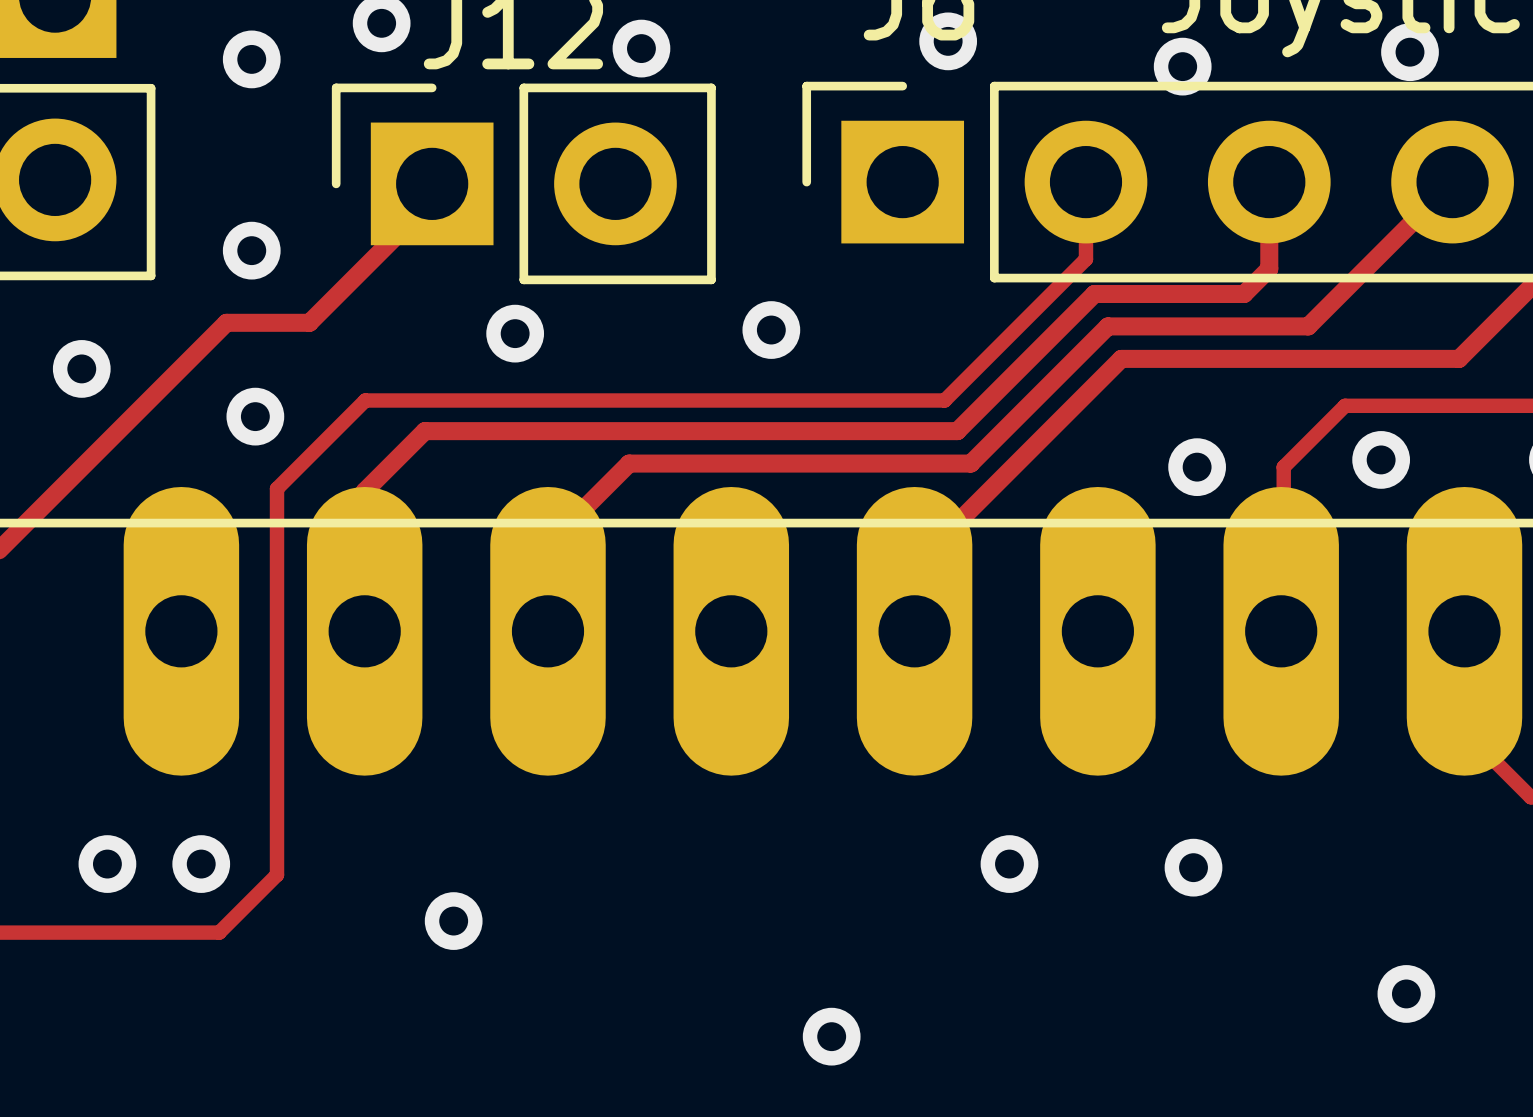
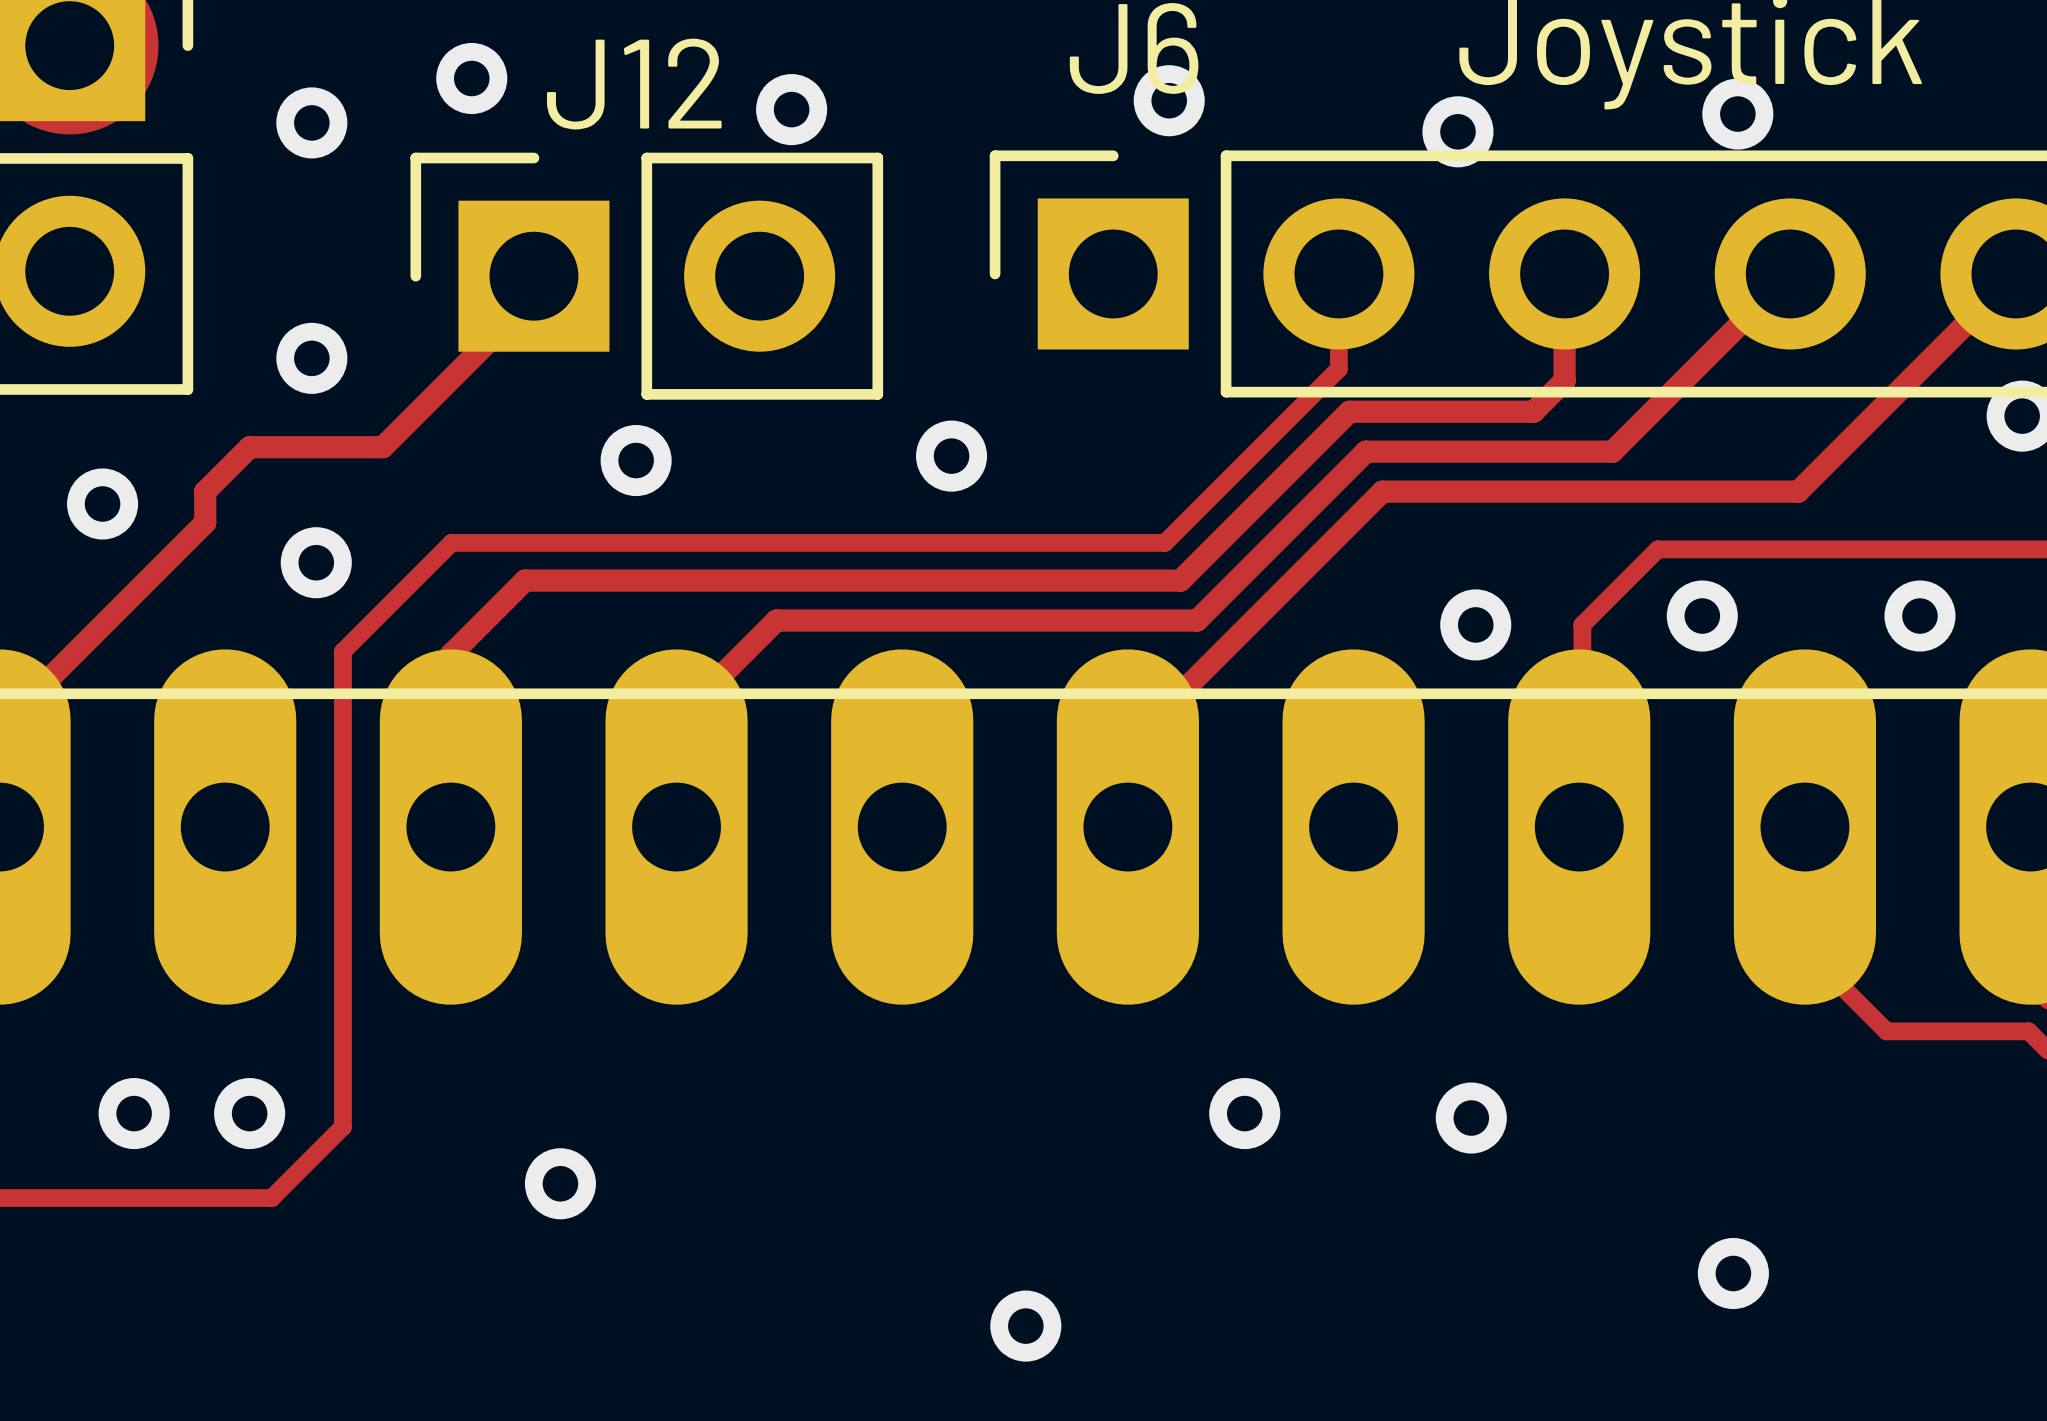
track: (226, 322) (165, 384) -> (280, 447) (249, 447) (205, 491) (205, 522)

